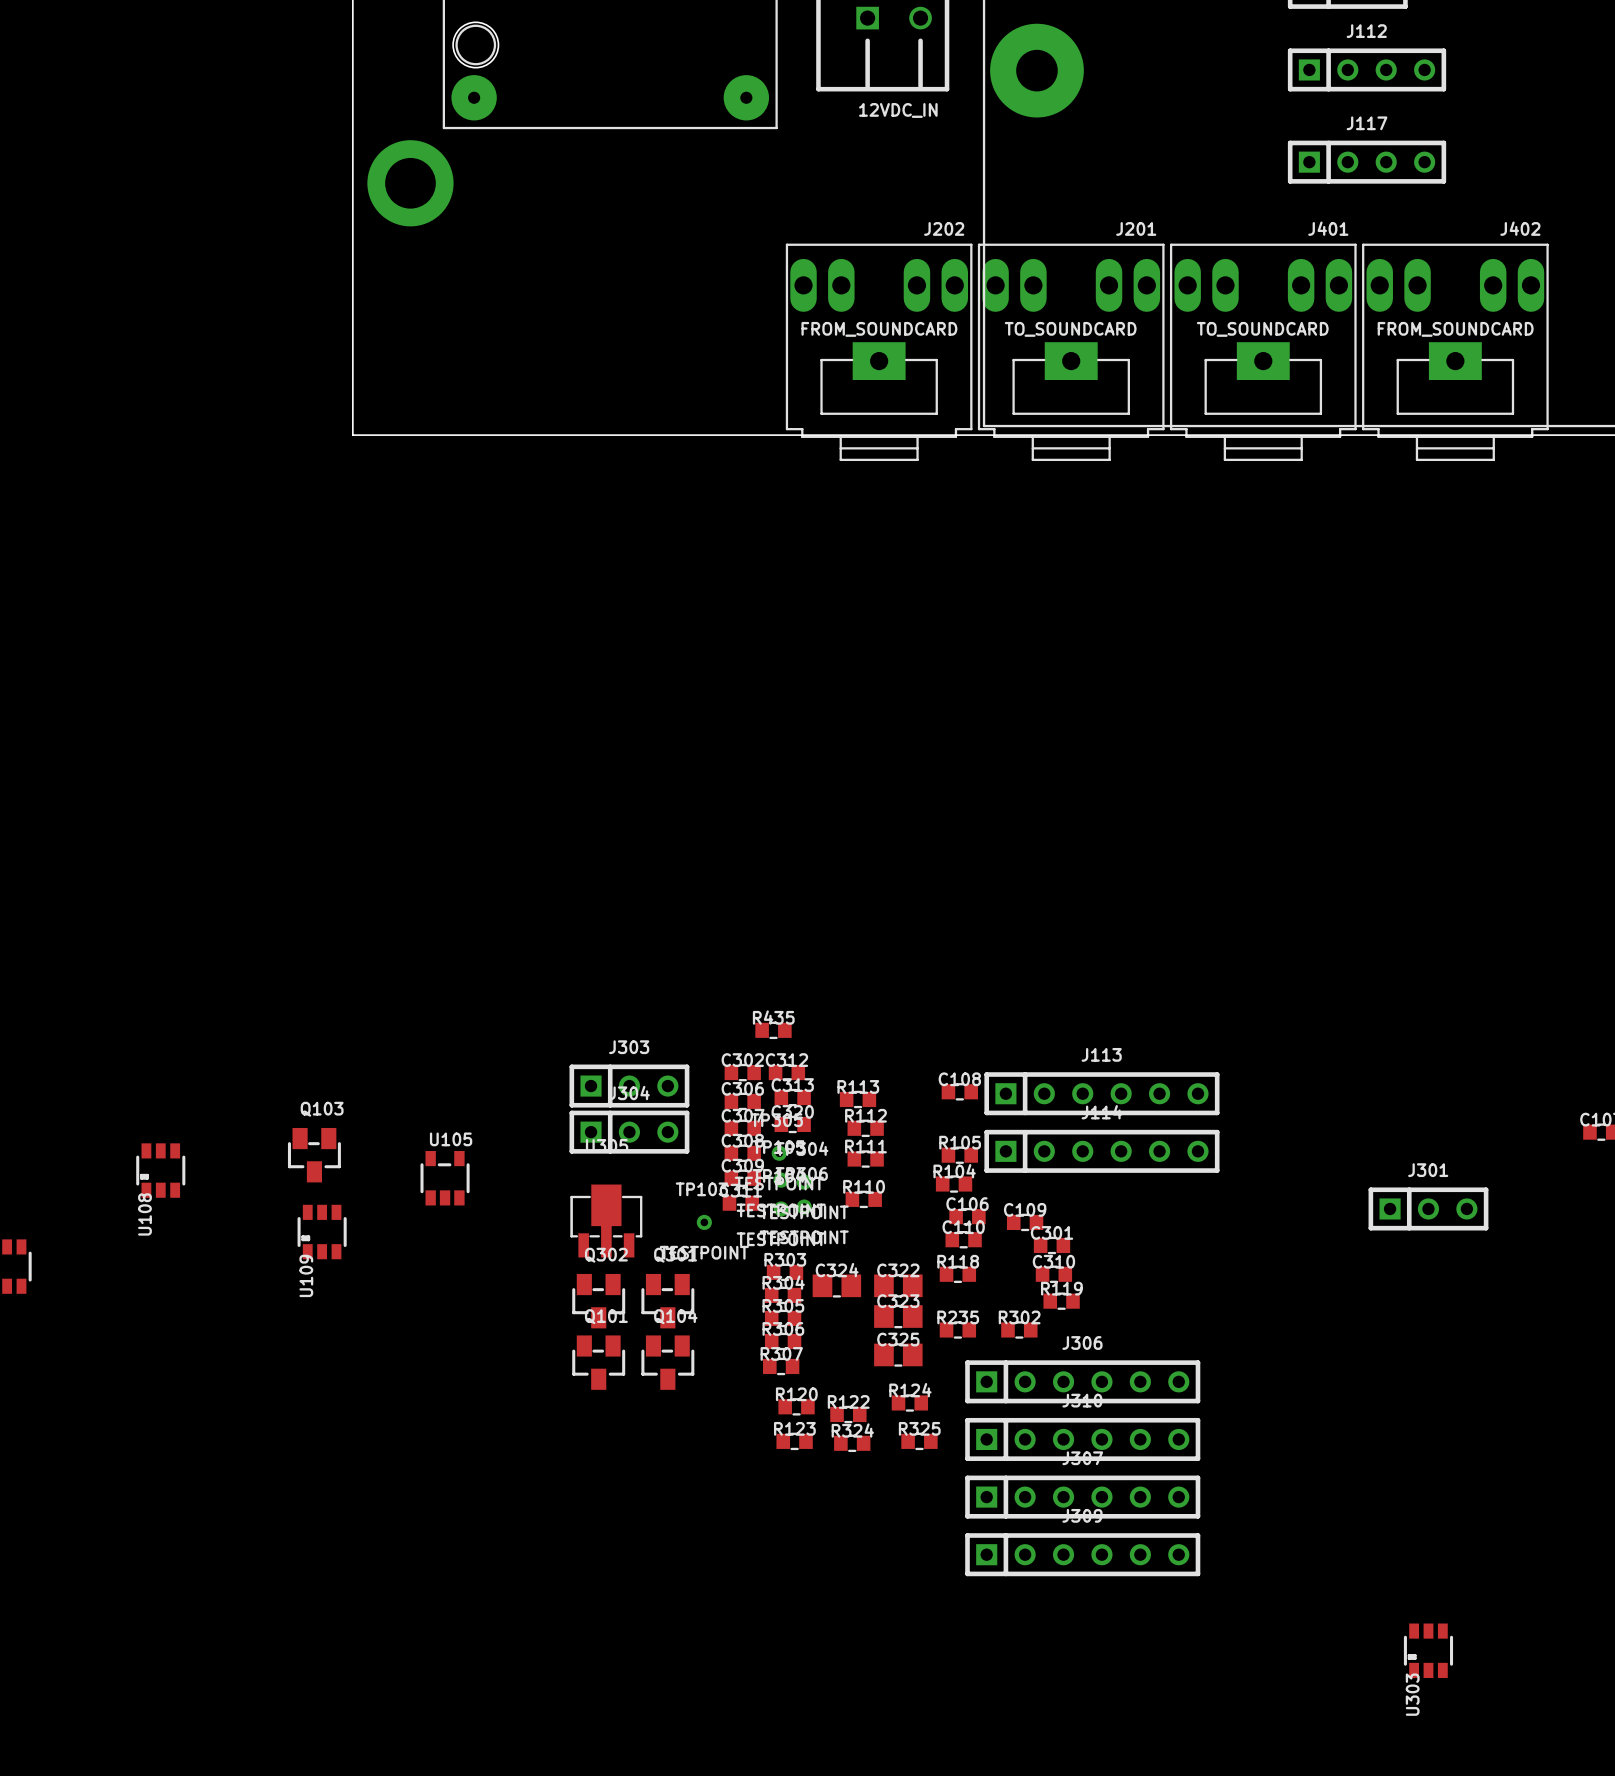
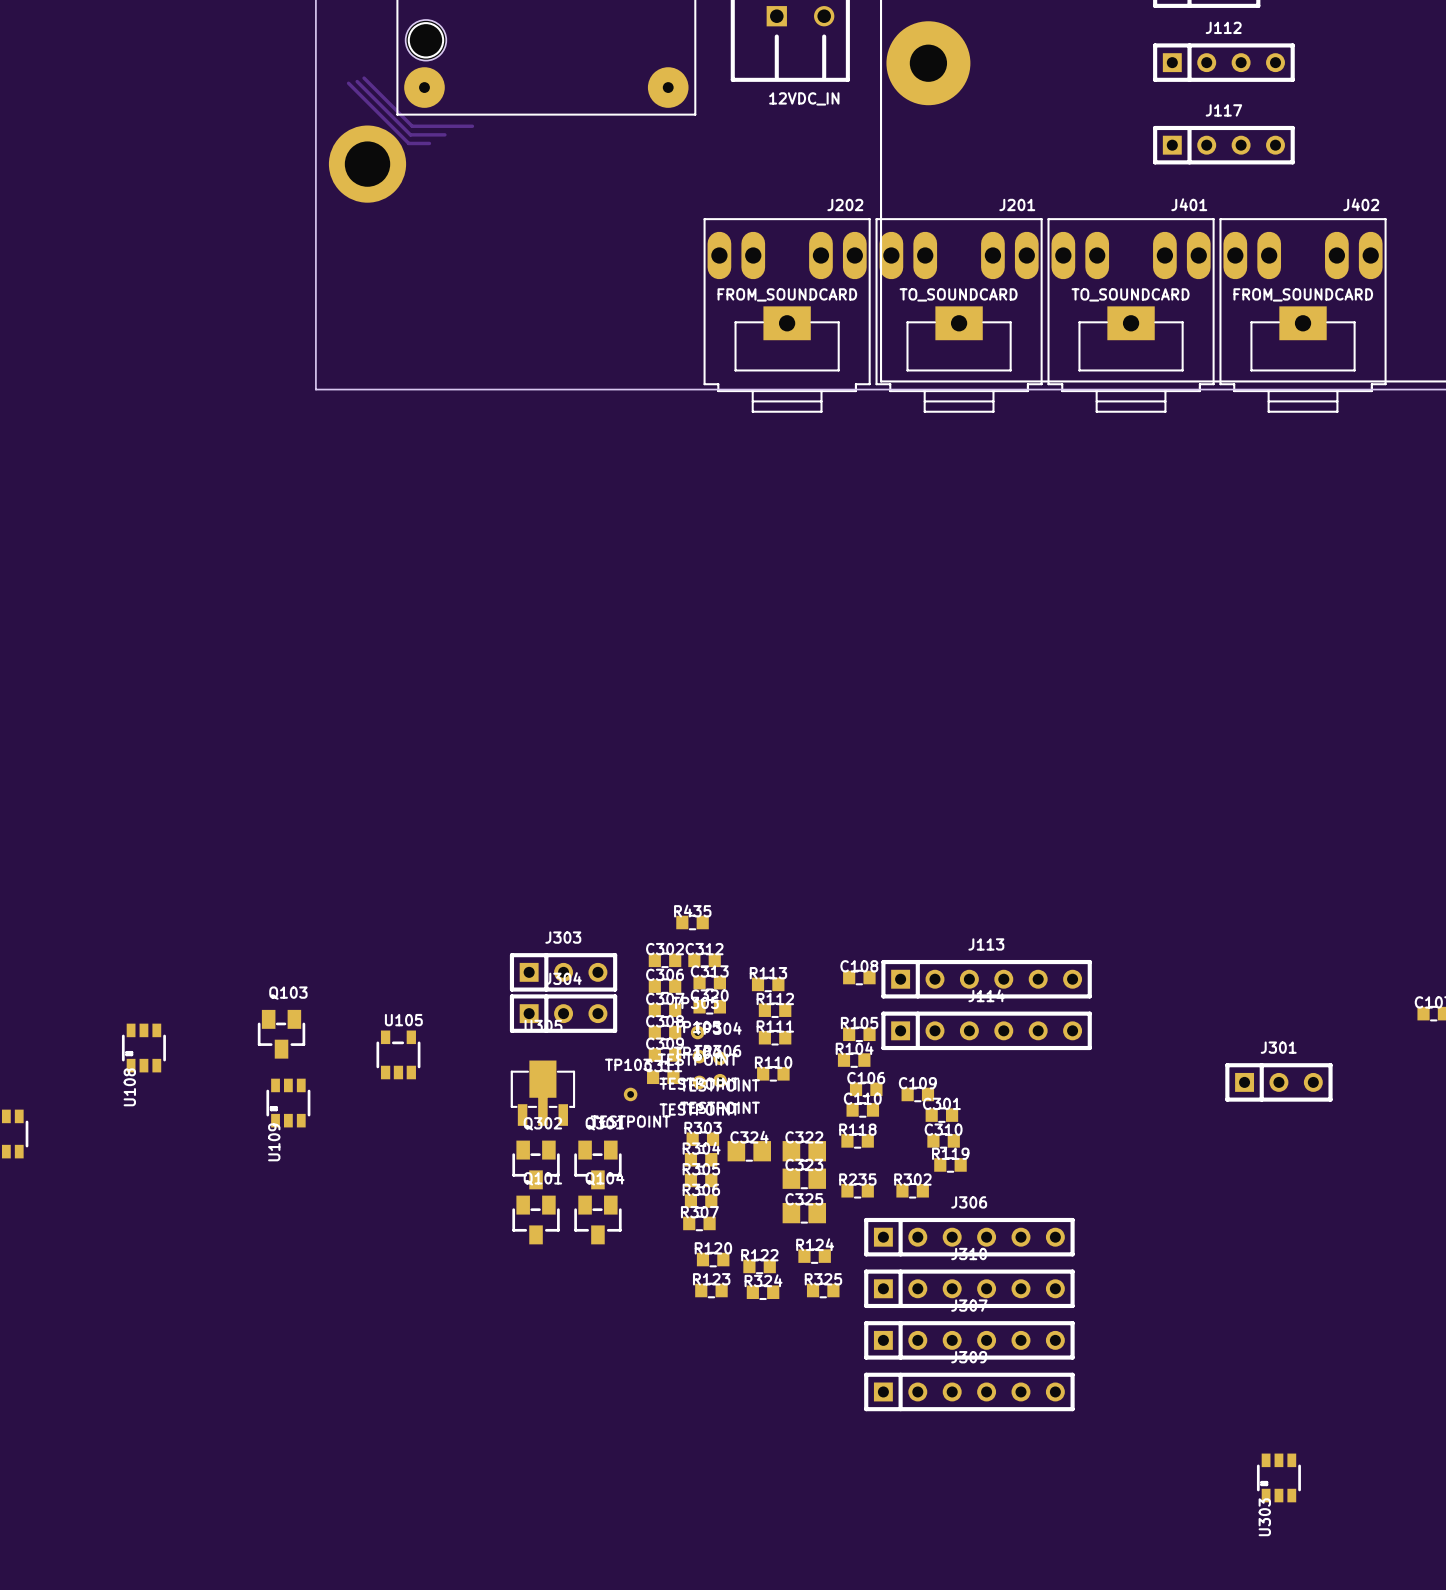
track: none -> (364, 78) (412, 126) (472, 126)
track: none -> (357, 81) (410, 134) (444, 134)
track: none -> (348, 83) (408, 143) (429, 143)

